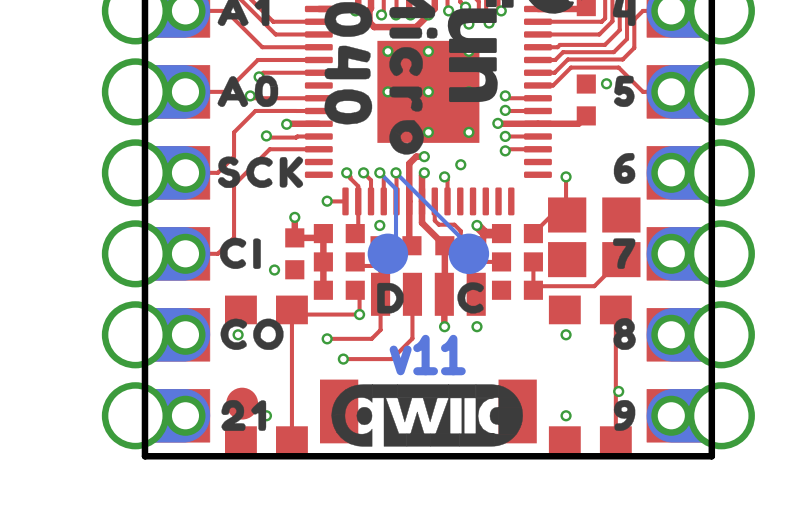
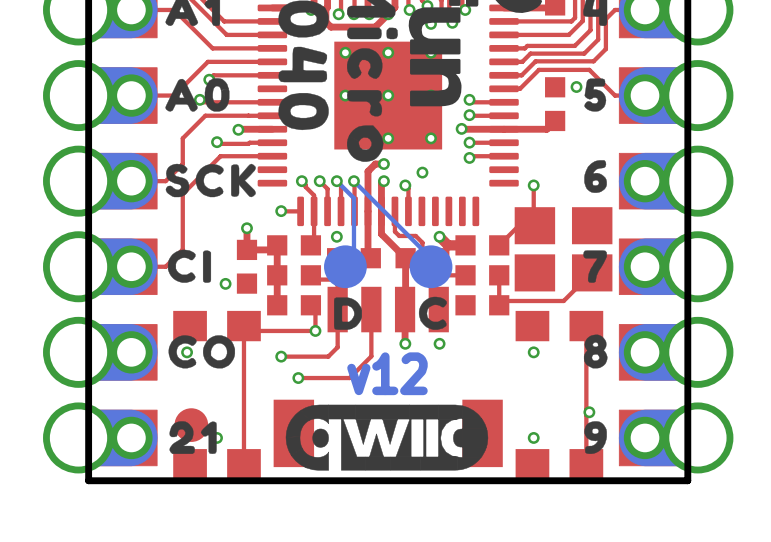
text: v11 (427, 355) -> v12 (387, 373)

